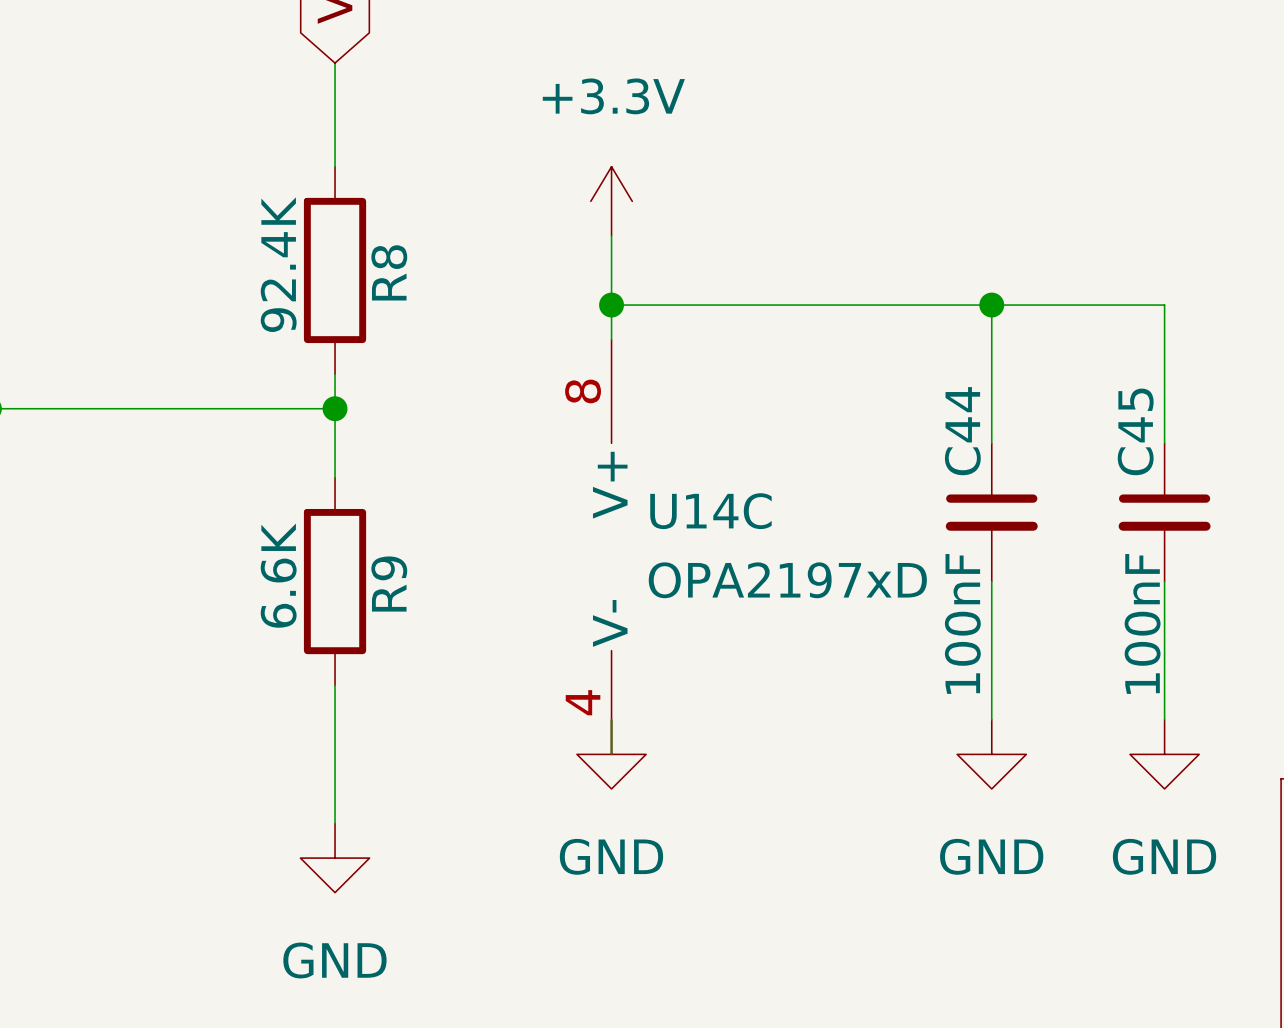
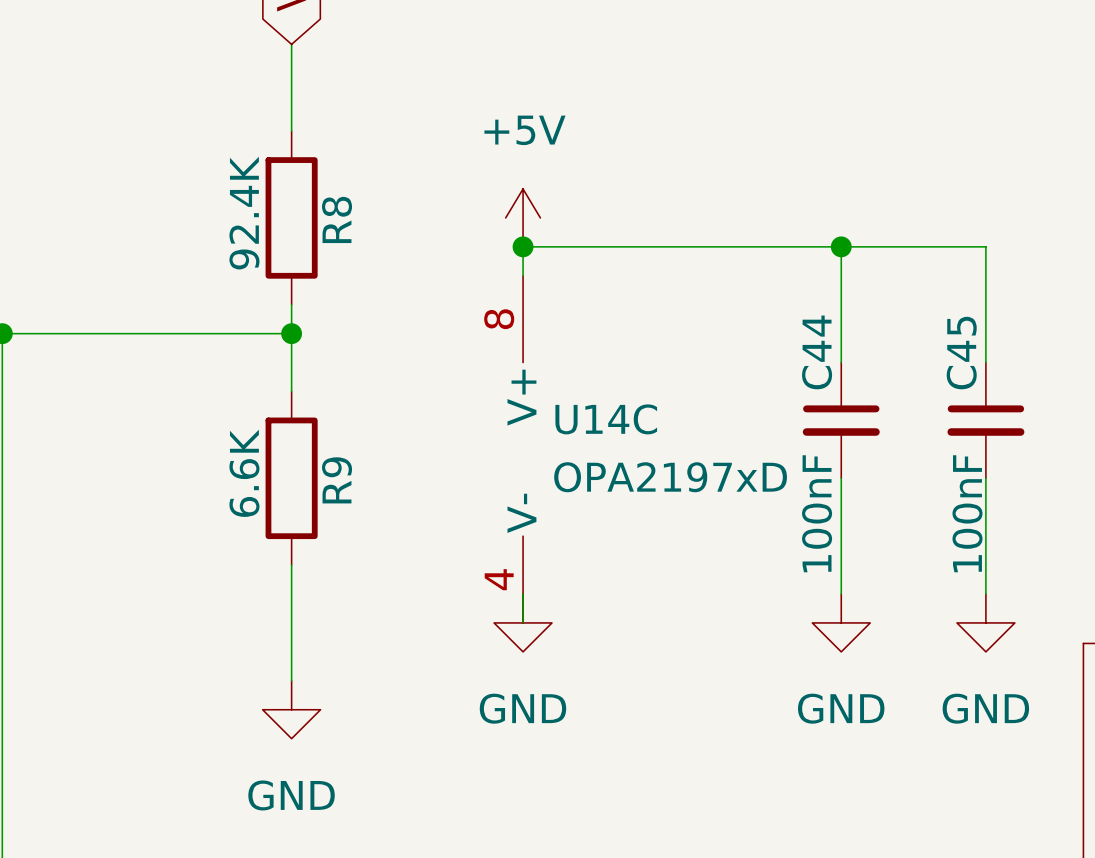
power symbol: +3.3V (611, 201) -> none
power symbol: none -> +5V (523, 217)

